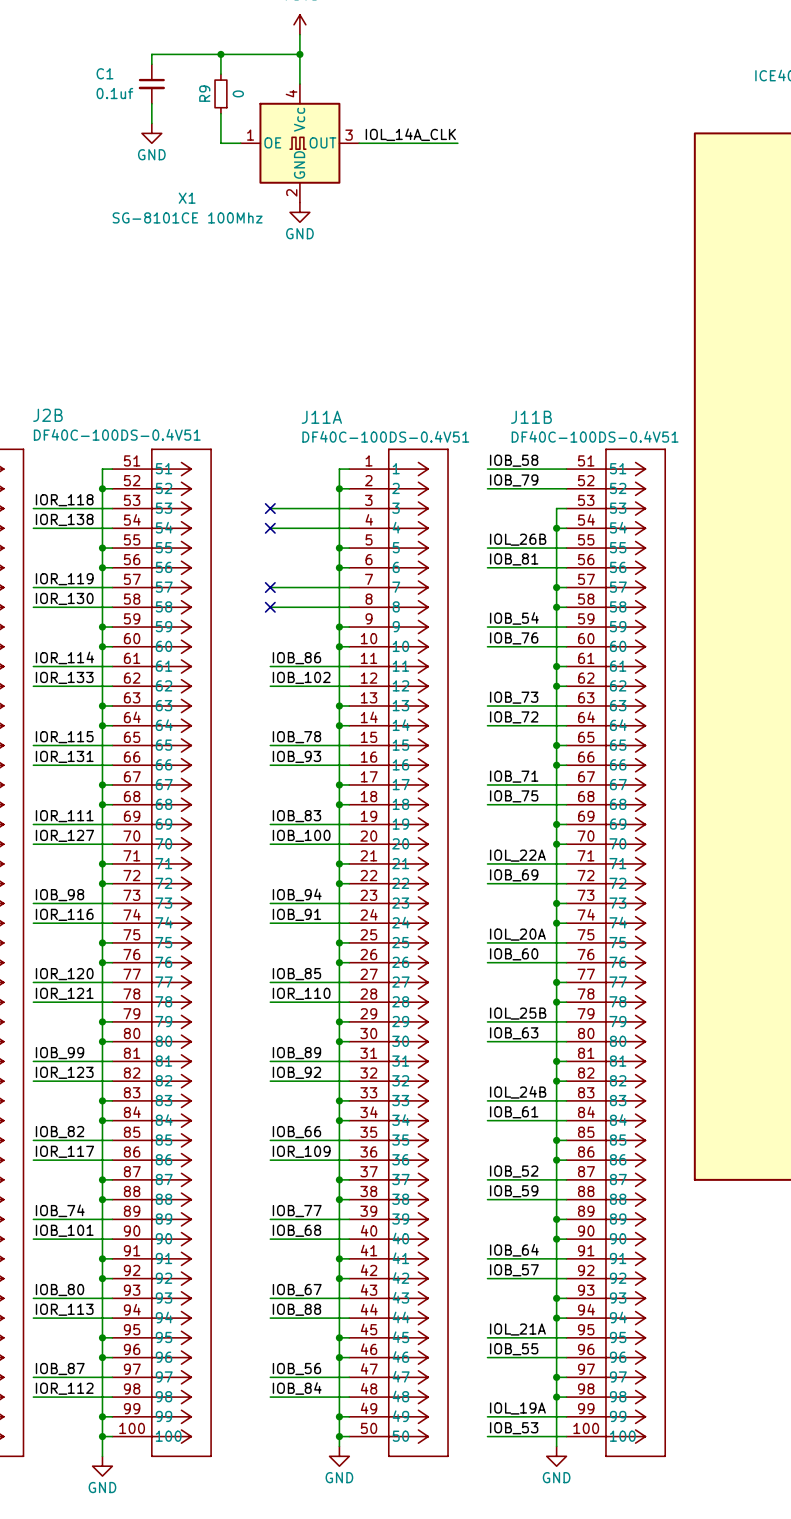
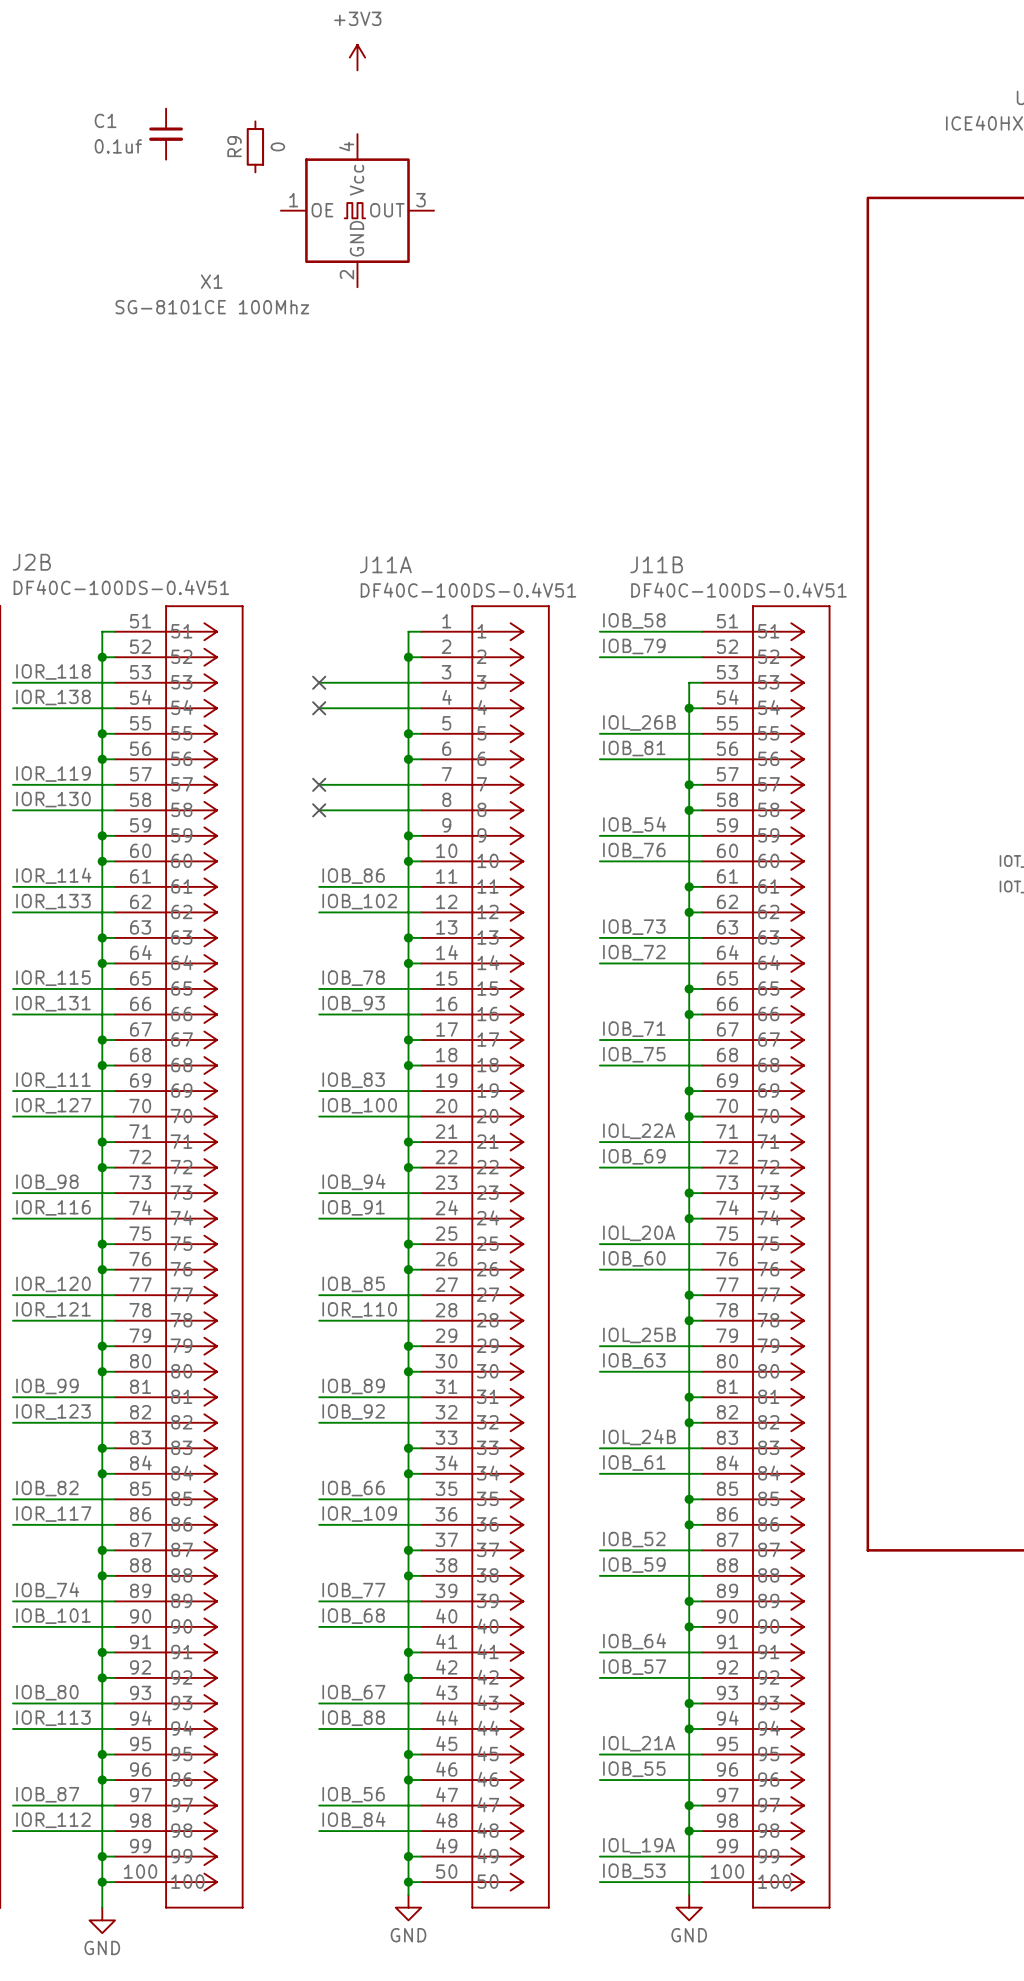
wire: (299, 34) (299, 84) -> none
wire: (220, 54) (220, 74) -> none
junction: (220, 54) -> none
wire: (299, 54) (151, 54) (151, 64) -> none
junction: (299, 54) -> none
wire: (151, 103) (151, 123) -> none
wire: (220, 113) (220, 143) (240, 143) -> none
power symbol: GND (151, 133) -> none
label: IOL_14A_CLK (410, 134) -> none
wire: (359, 143) (457, 143) -> none
power symbol: GND (299, 212) -> none

